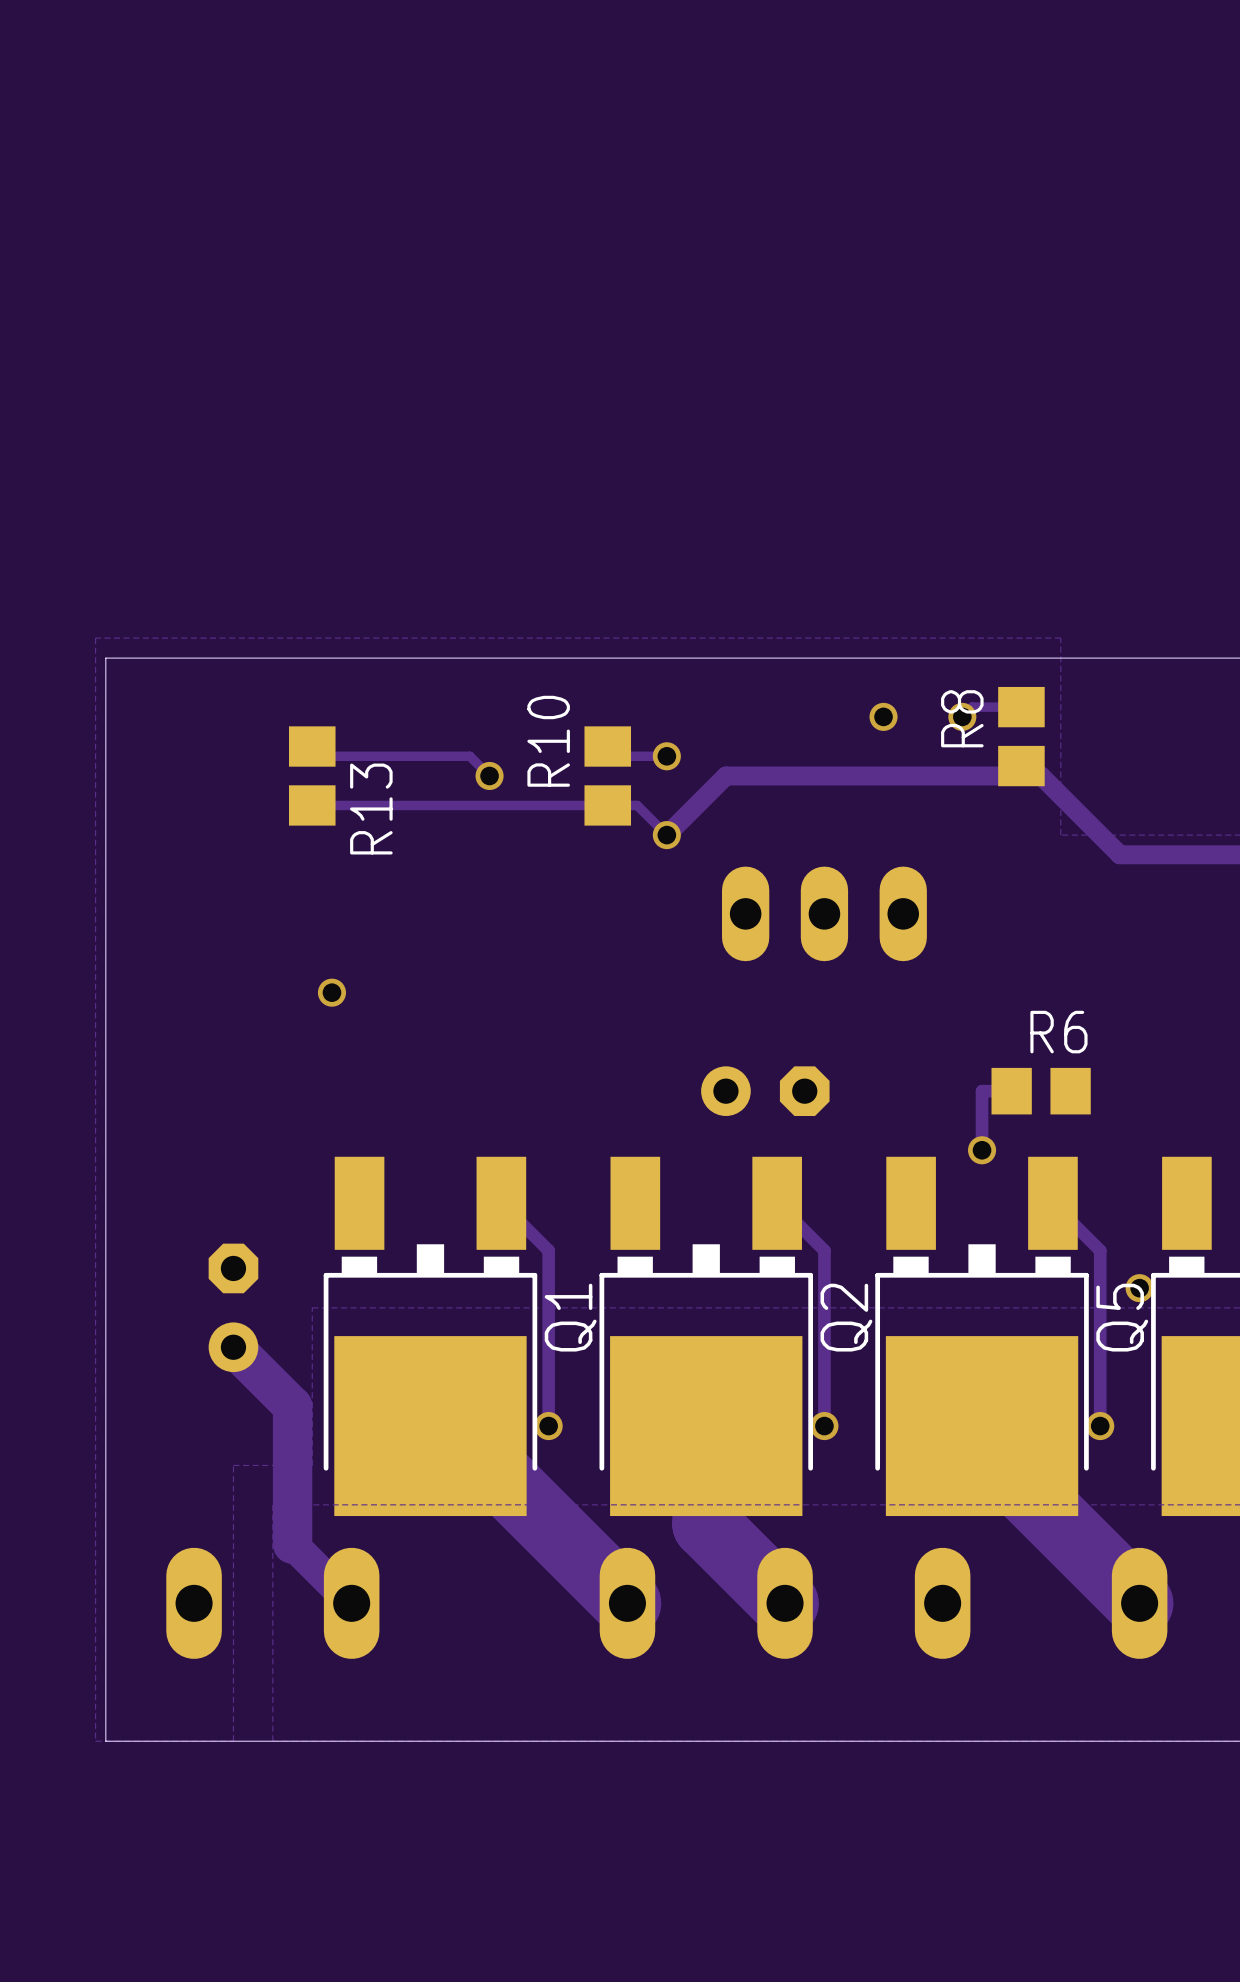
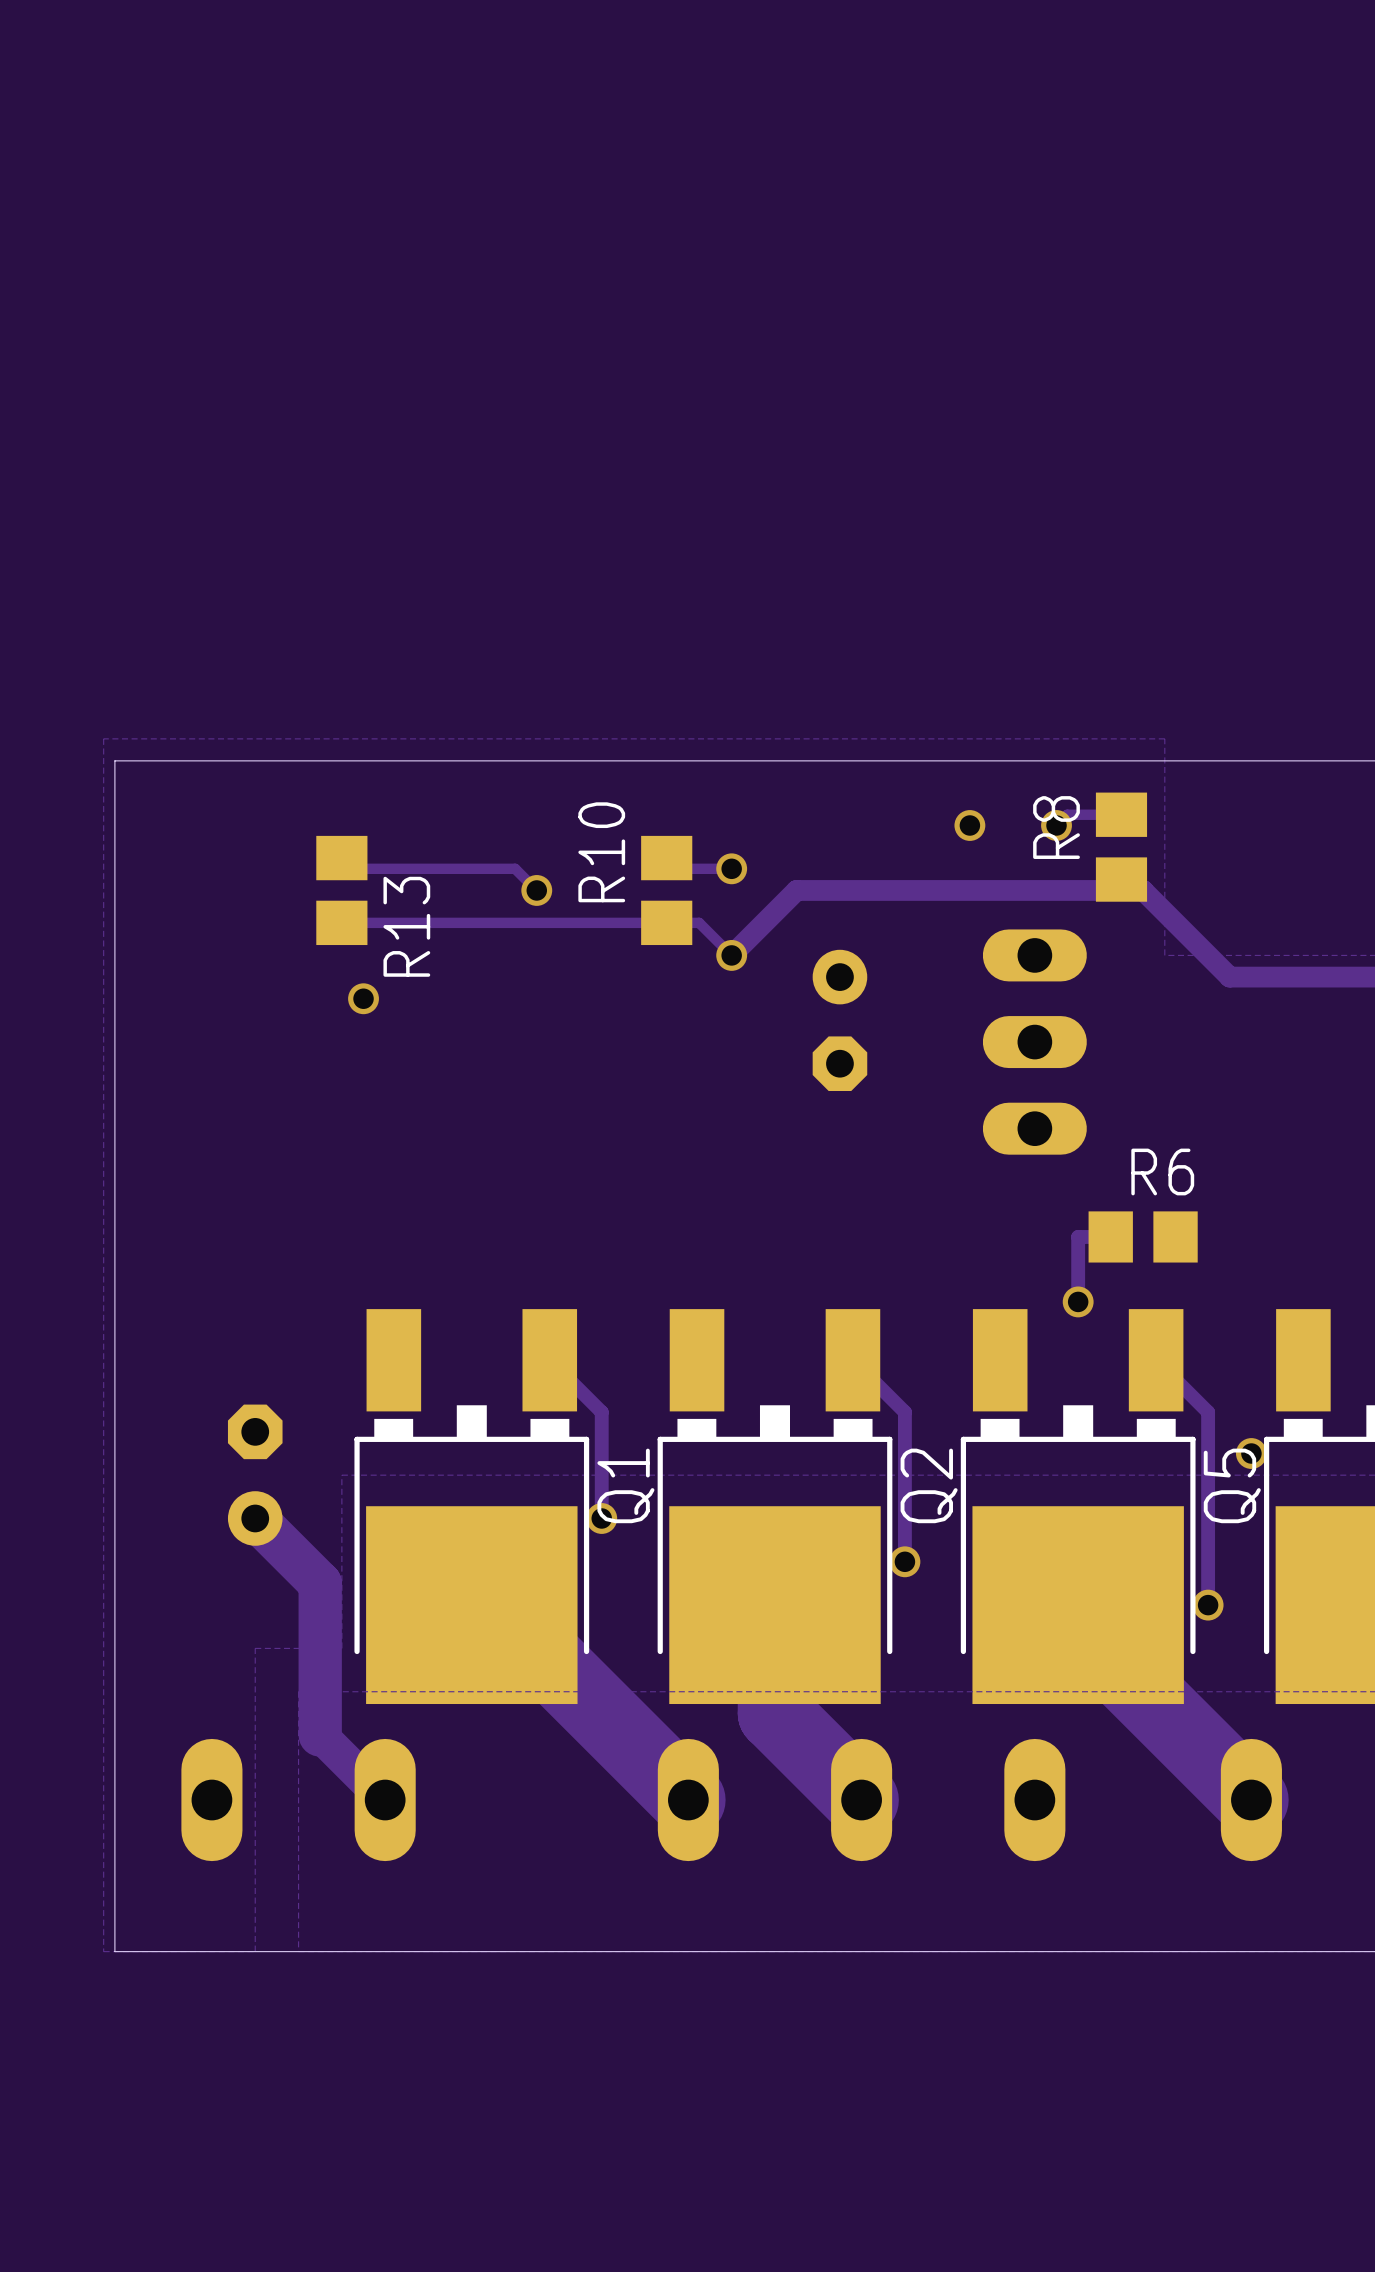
part rotation: 0° (824, 913) -> 90° clockwise (1034, 1042)
via position: (331, 992) -> (363, 998)
part rotation: 0° (765, 1091) -> 90° clockwise (839, 1020)
part position: (765, 1091) -> (839, 1020)
track: (548, 1347) (548, 1426) -> none
track: (824, 1386) (824, 1426) -> none
via position: (548, 1426) -> (601, 1518)
via position: (824, 1426) -> (904, 1561)

